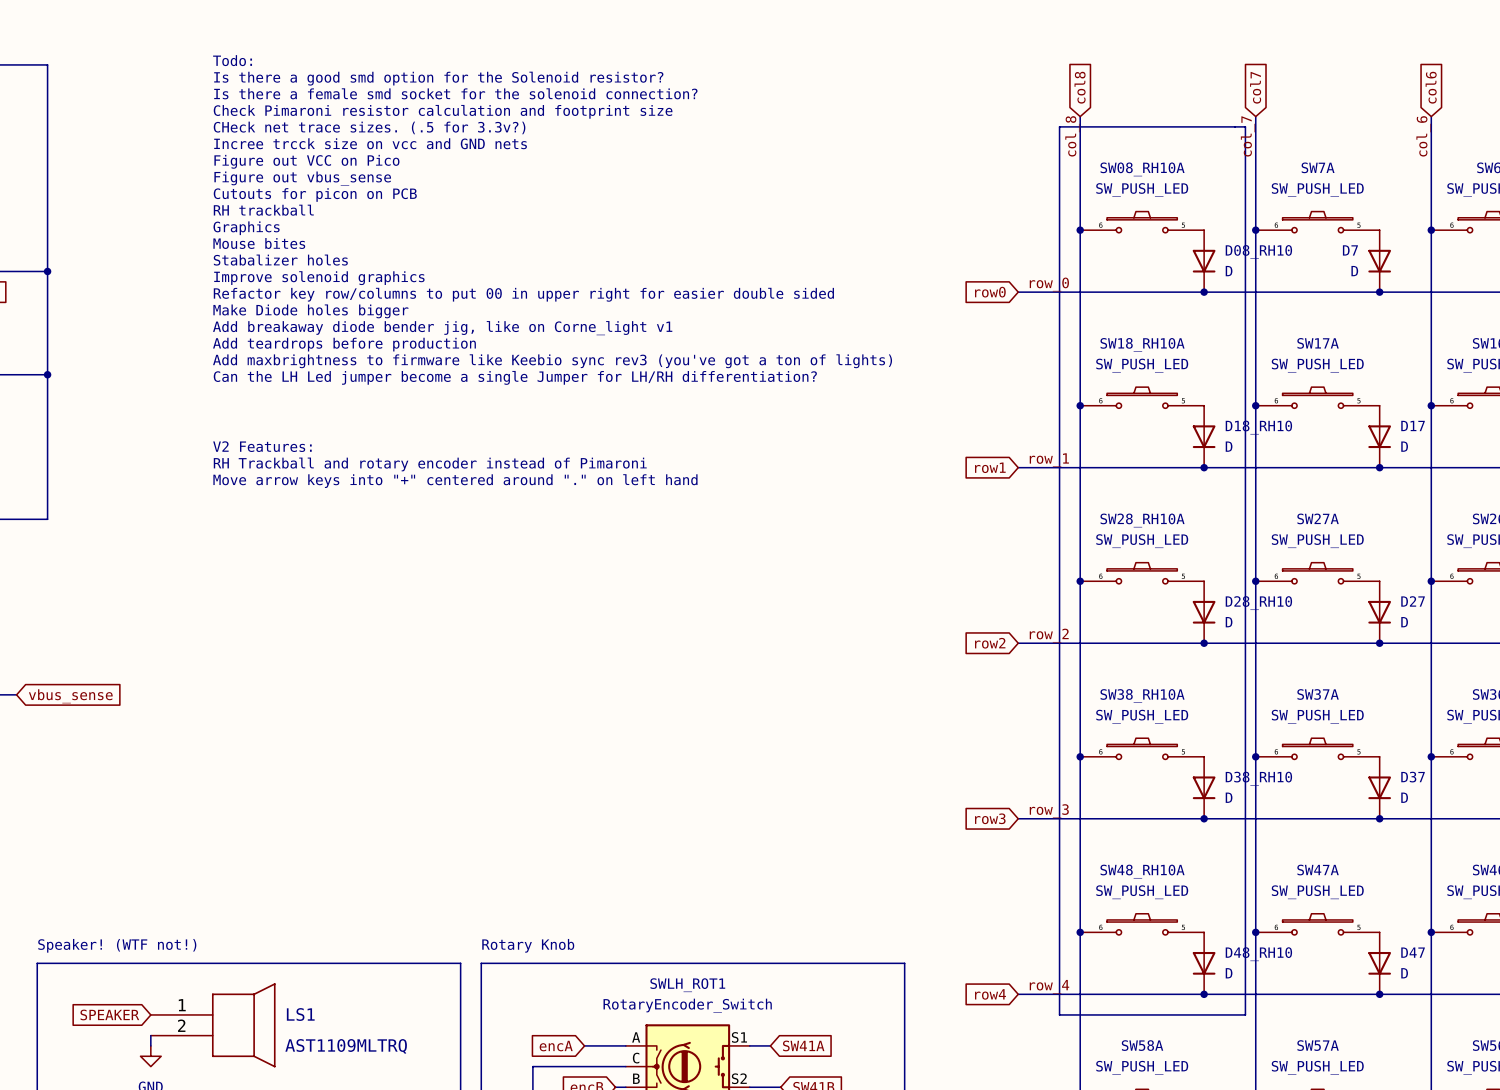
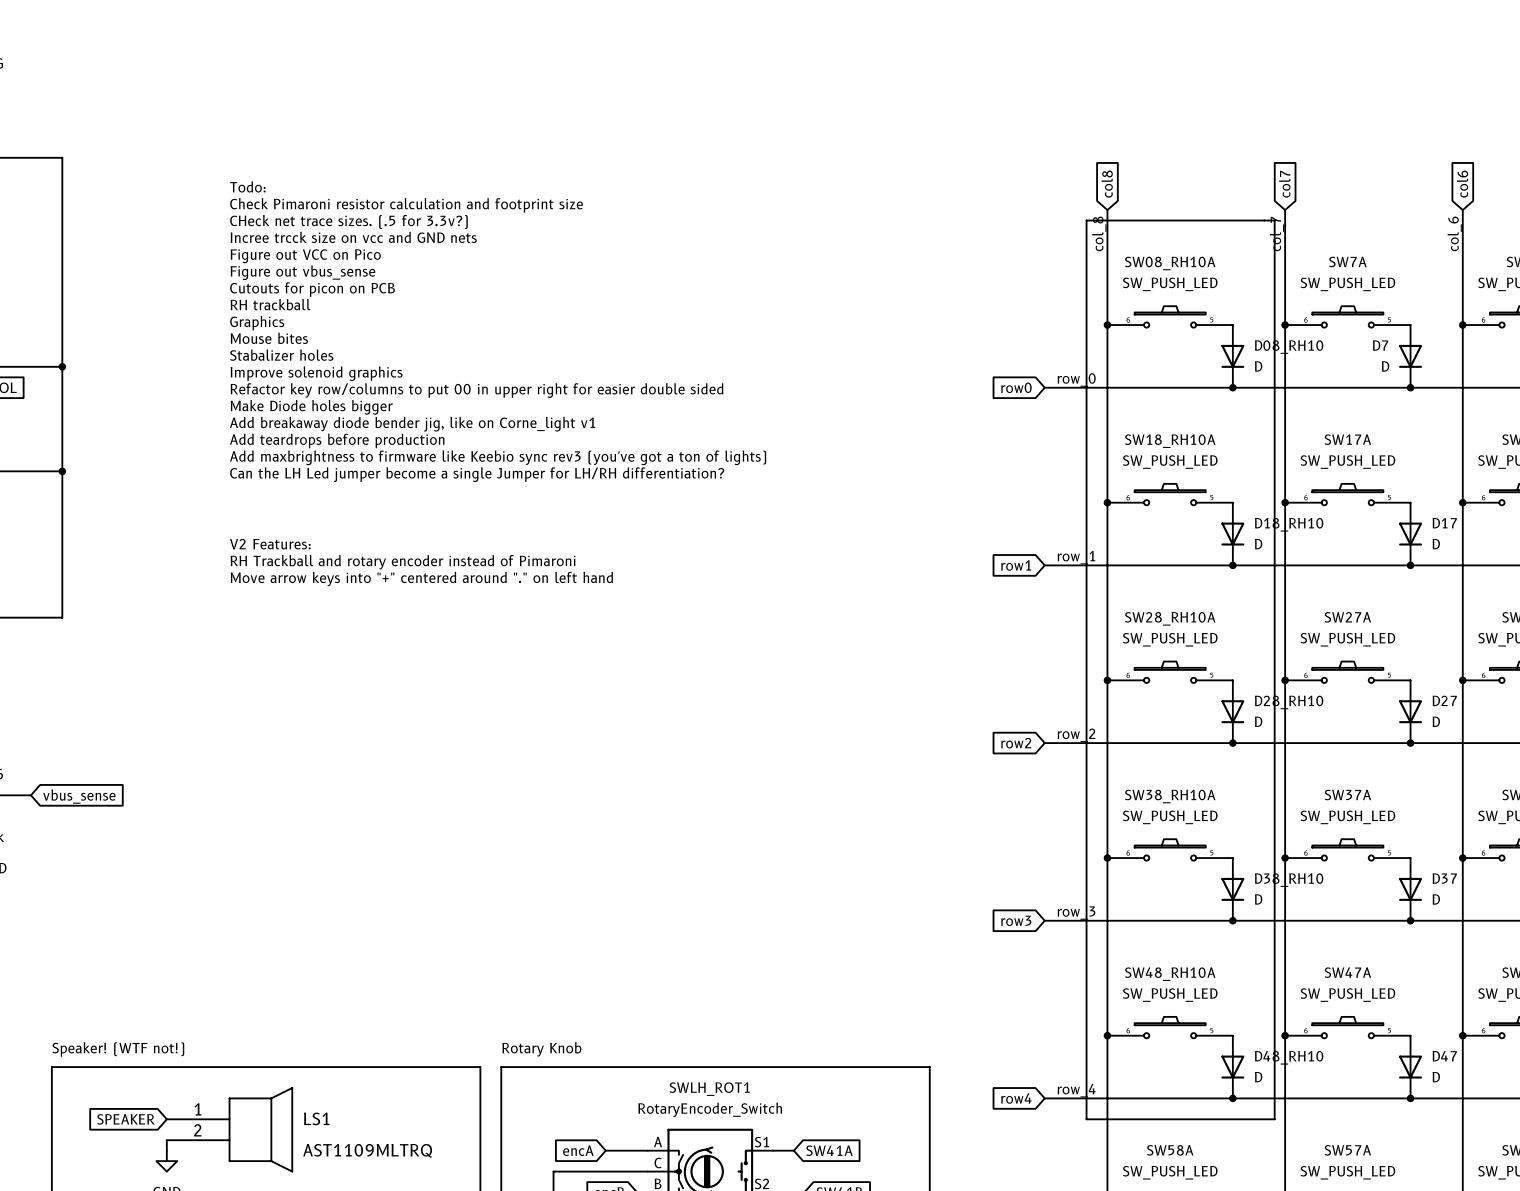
text: Todo: (232, 60) -> none
text: Is there a good smd option for the Solenoid resistor? (438, 78) -> none
text: Is there a female smd socket for the solenoid connection? (455, 93) -> Todo: (247, 186)

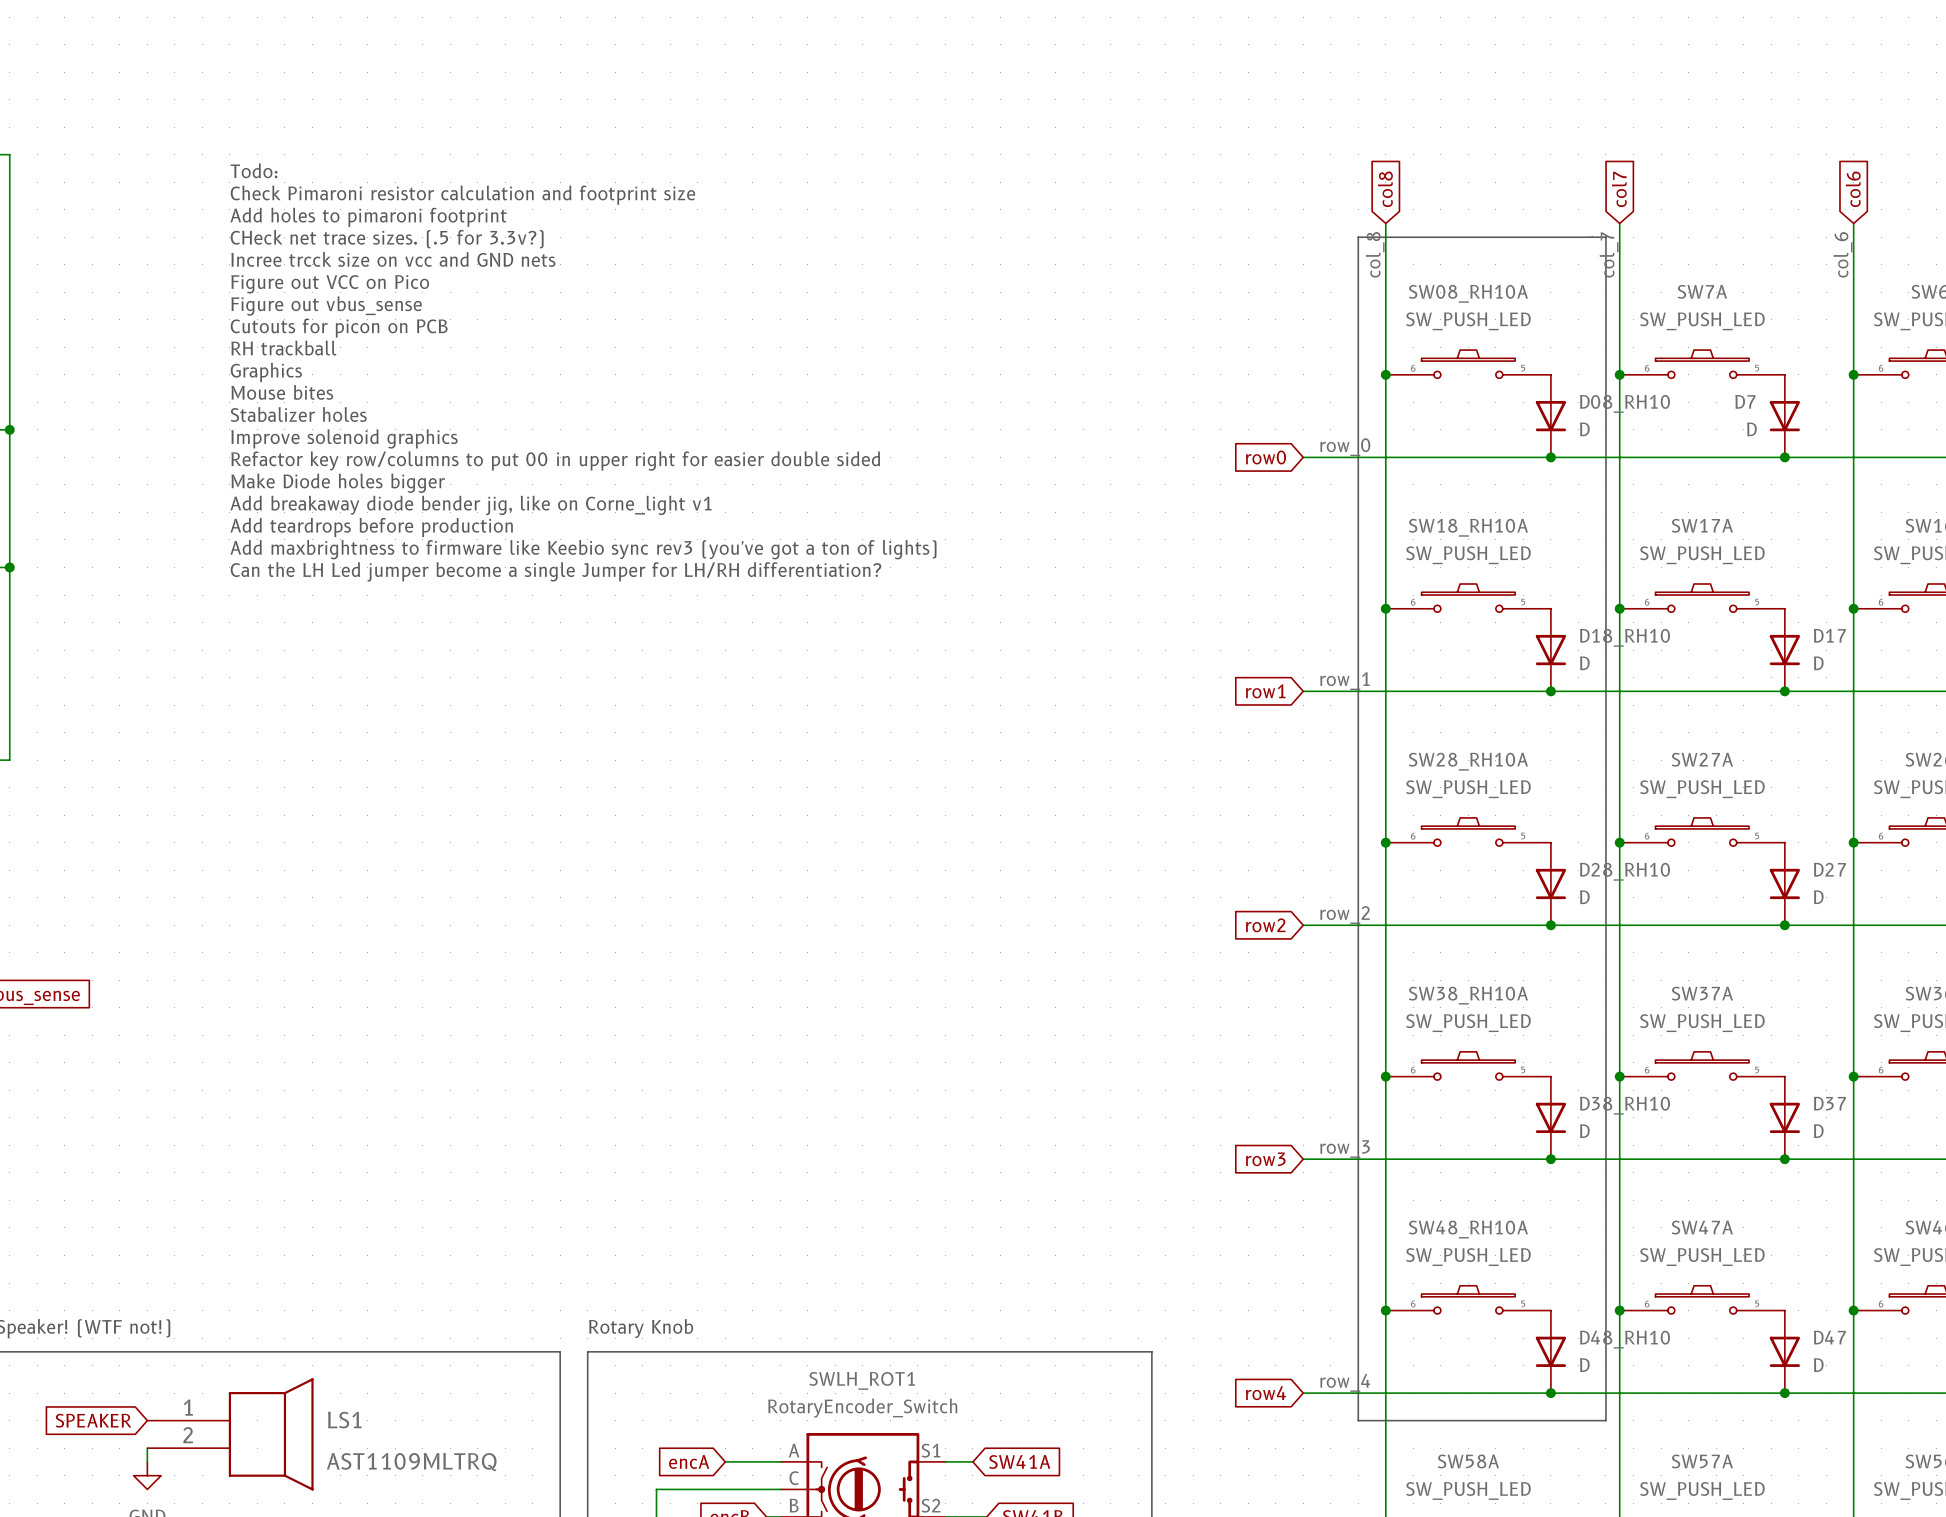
text: none -> Todo: (254, 170)
text: Todo: (247, 186) -> Check Pimaroni resistor calculation and footprint size (462, 195)
text: Check Pimaroni resistor calculation and footprint size (406, 205) -> Add holes to pimaroni footprint (368, 217)
text: V2 Features: (270, 544) -> none
text: RH Trackball and rotary encoder instead of Pimaroni (402, 562) -> none
text: Move arrow keys into "+" centered around "." on left hand (421, 579) -> none

